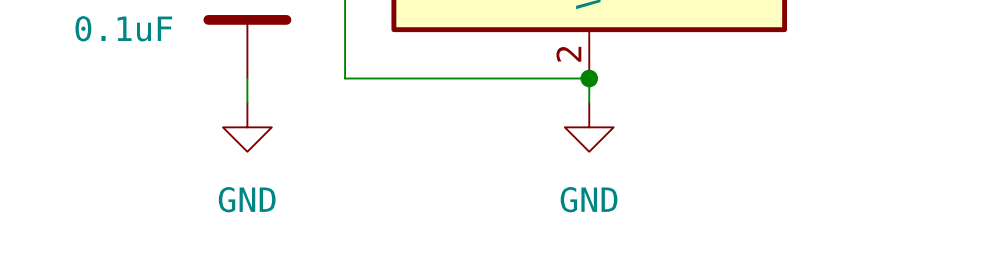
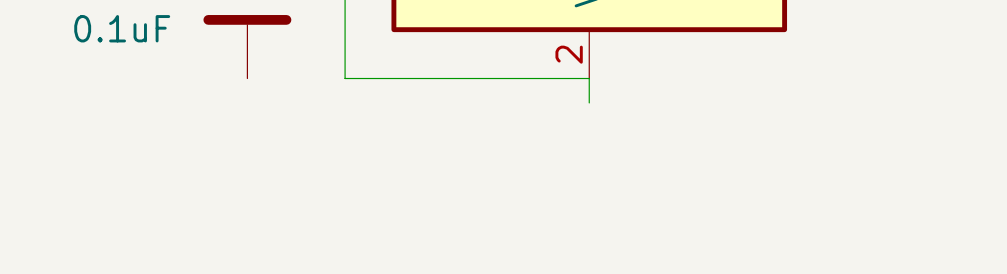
wire: (247, 78) (247, 102) -> none
junction: (589, 78) -> none
power symbol: GND (247, 127) -> none
power symbol: GND (589, 127) -> none

